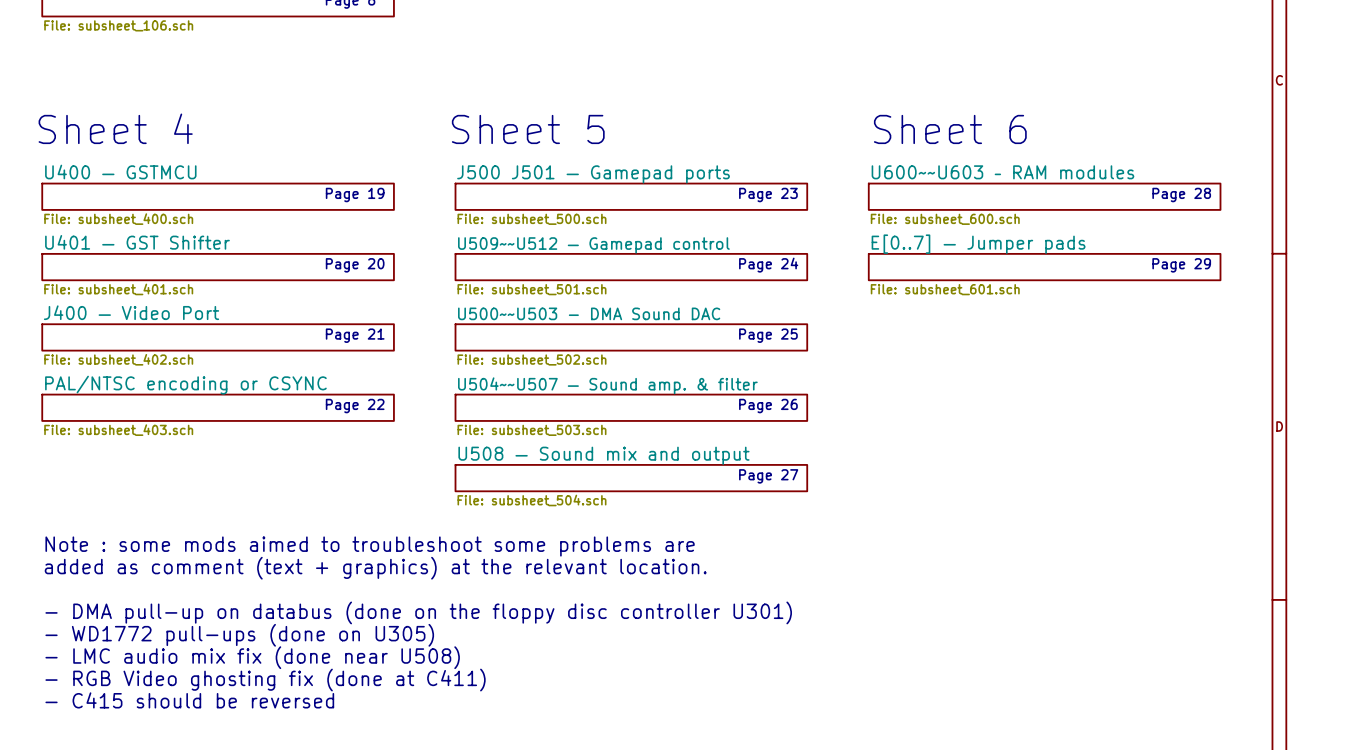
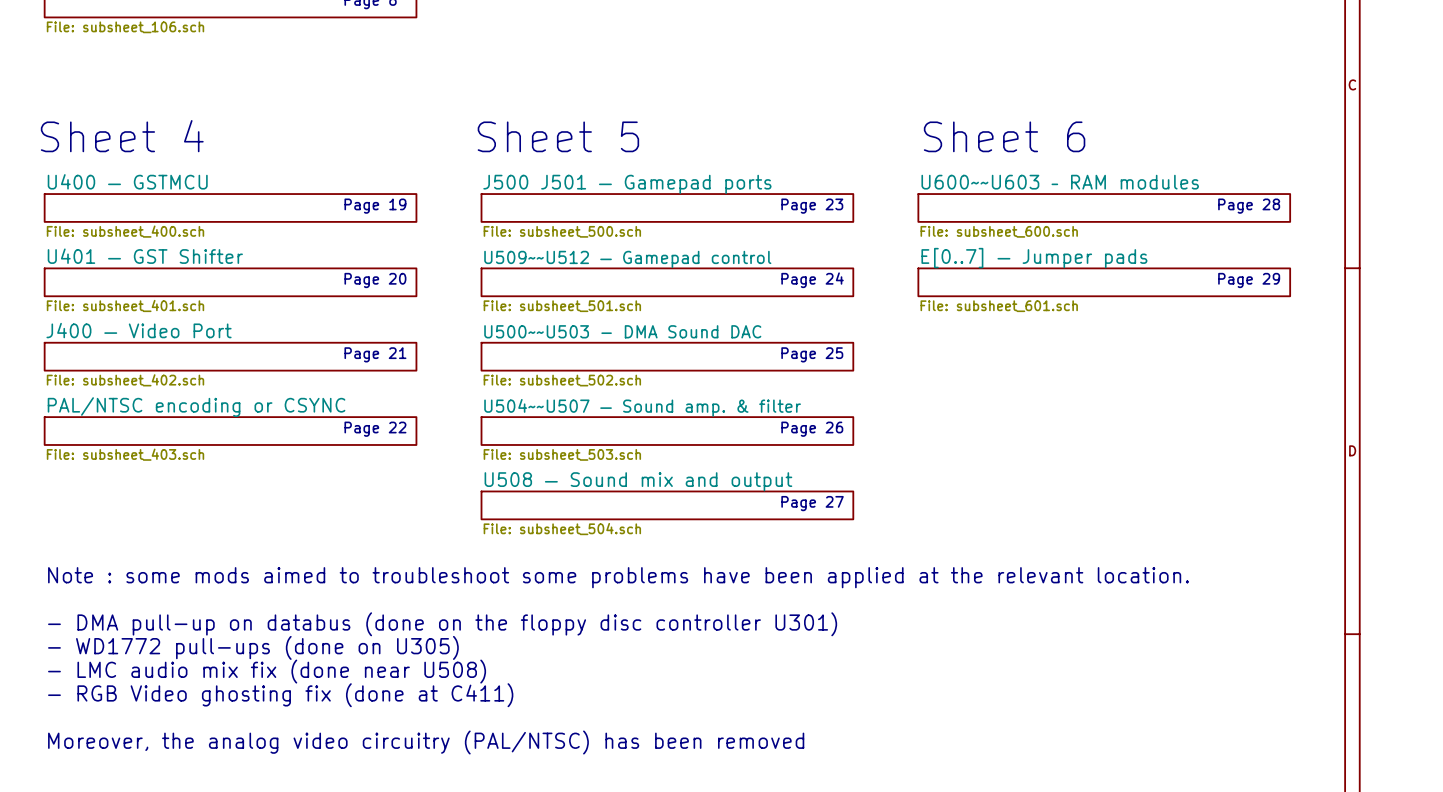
text: Note : some mods aimed to troubleshoot some problems are (370, 546) -> Note : some mods aimed to troubleshoot some problems have been applied at the relevant location. (618, 577)
text: added as comment (text + graphics) at the relevant location. (375, 568) -> none
text: none -> - DMA pull-up on databus (done on the floppy disc controller U301) (442, 624)
text: - DMA pull-up on databus (done on the floppy disc controller U301) (418, 612) -> - WD1772 pull-ups (done on U305) (253, 647)
text: - WD1772 pull-ups (done on U305) (239, 635) -> - LMC audio mix fix (done near U508) (267, 671)
text: - LMC audio mix fix (done near U508) (252, 657) -> - RGB Video ghosting fix (done at C411) (280, 695)
text: - RGB Video ghosting fix (done at C411) (265, 680) -> none
text: - C415 should be reversed (189, 700) -> Moreover, the analog video circuitry (PAL/NTSC) has been removed (426, 742)

